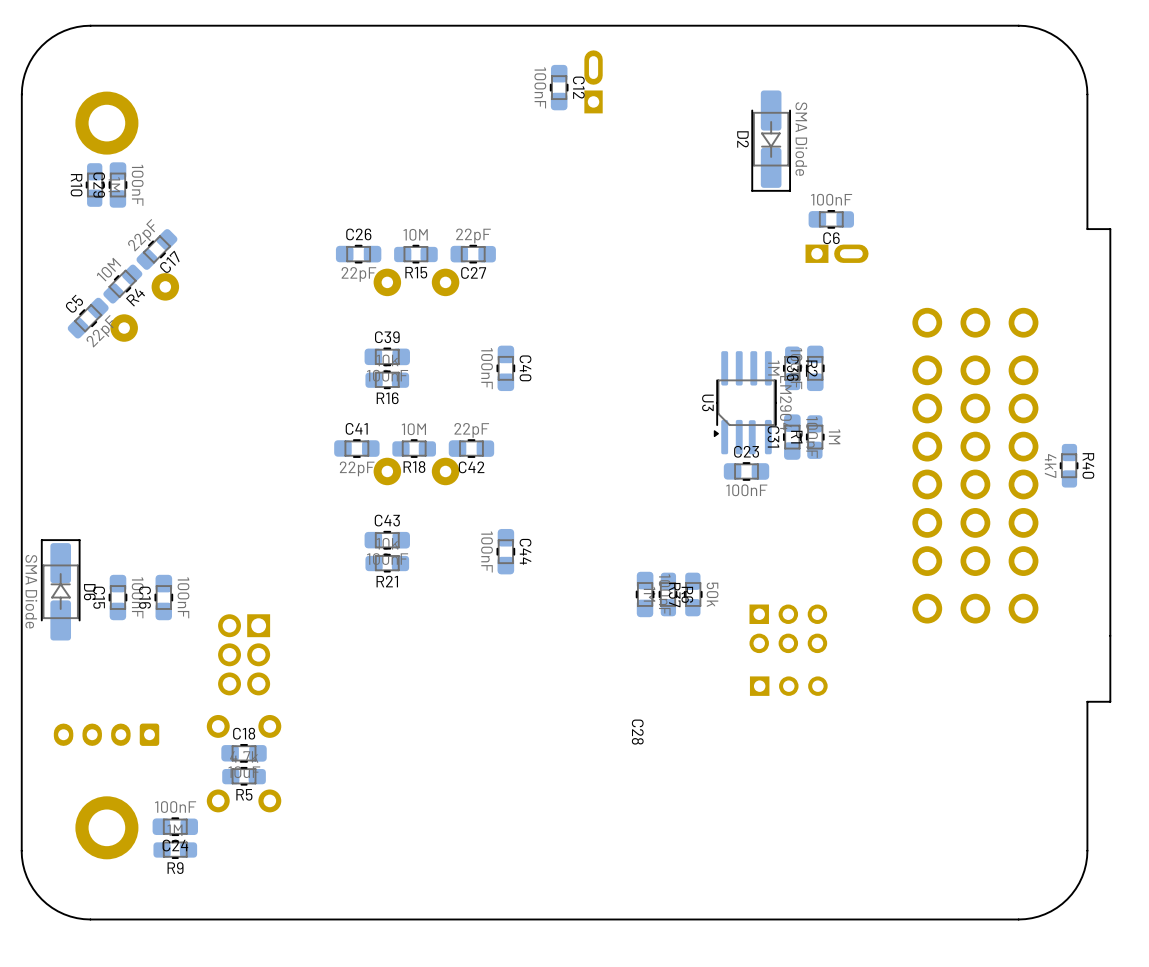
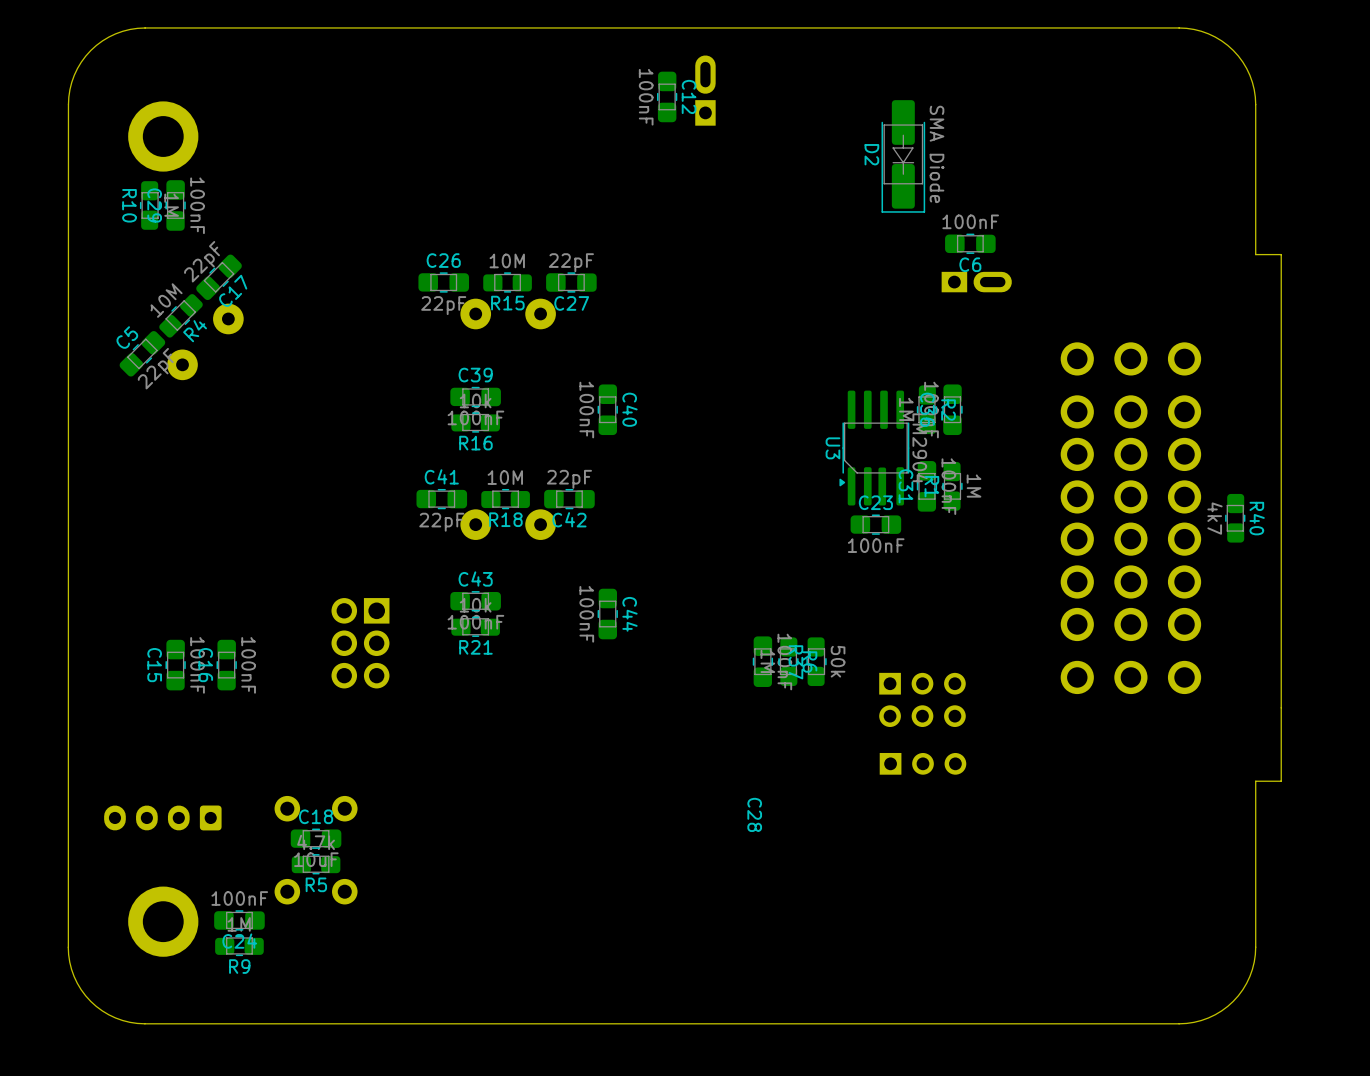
D6: SMA Diode (60, 589) -> none
part position: (244, 654) -> (360, 643)

